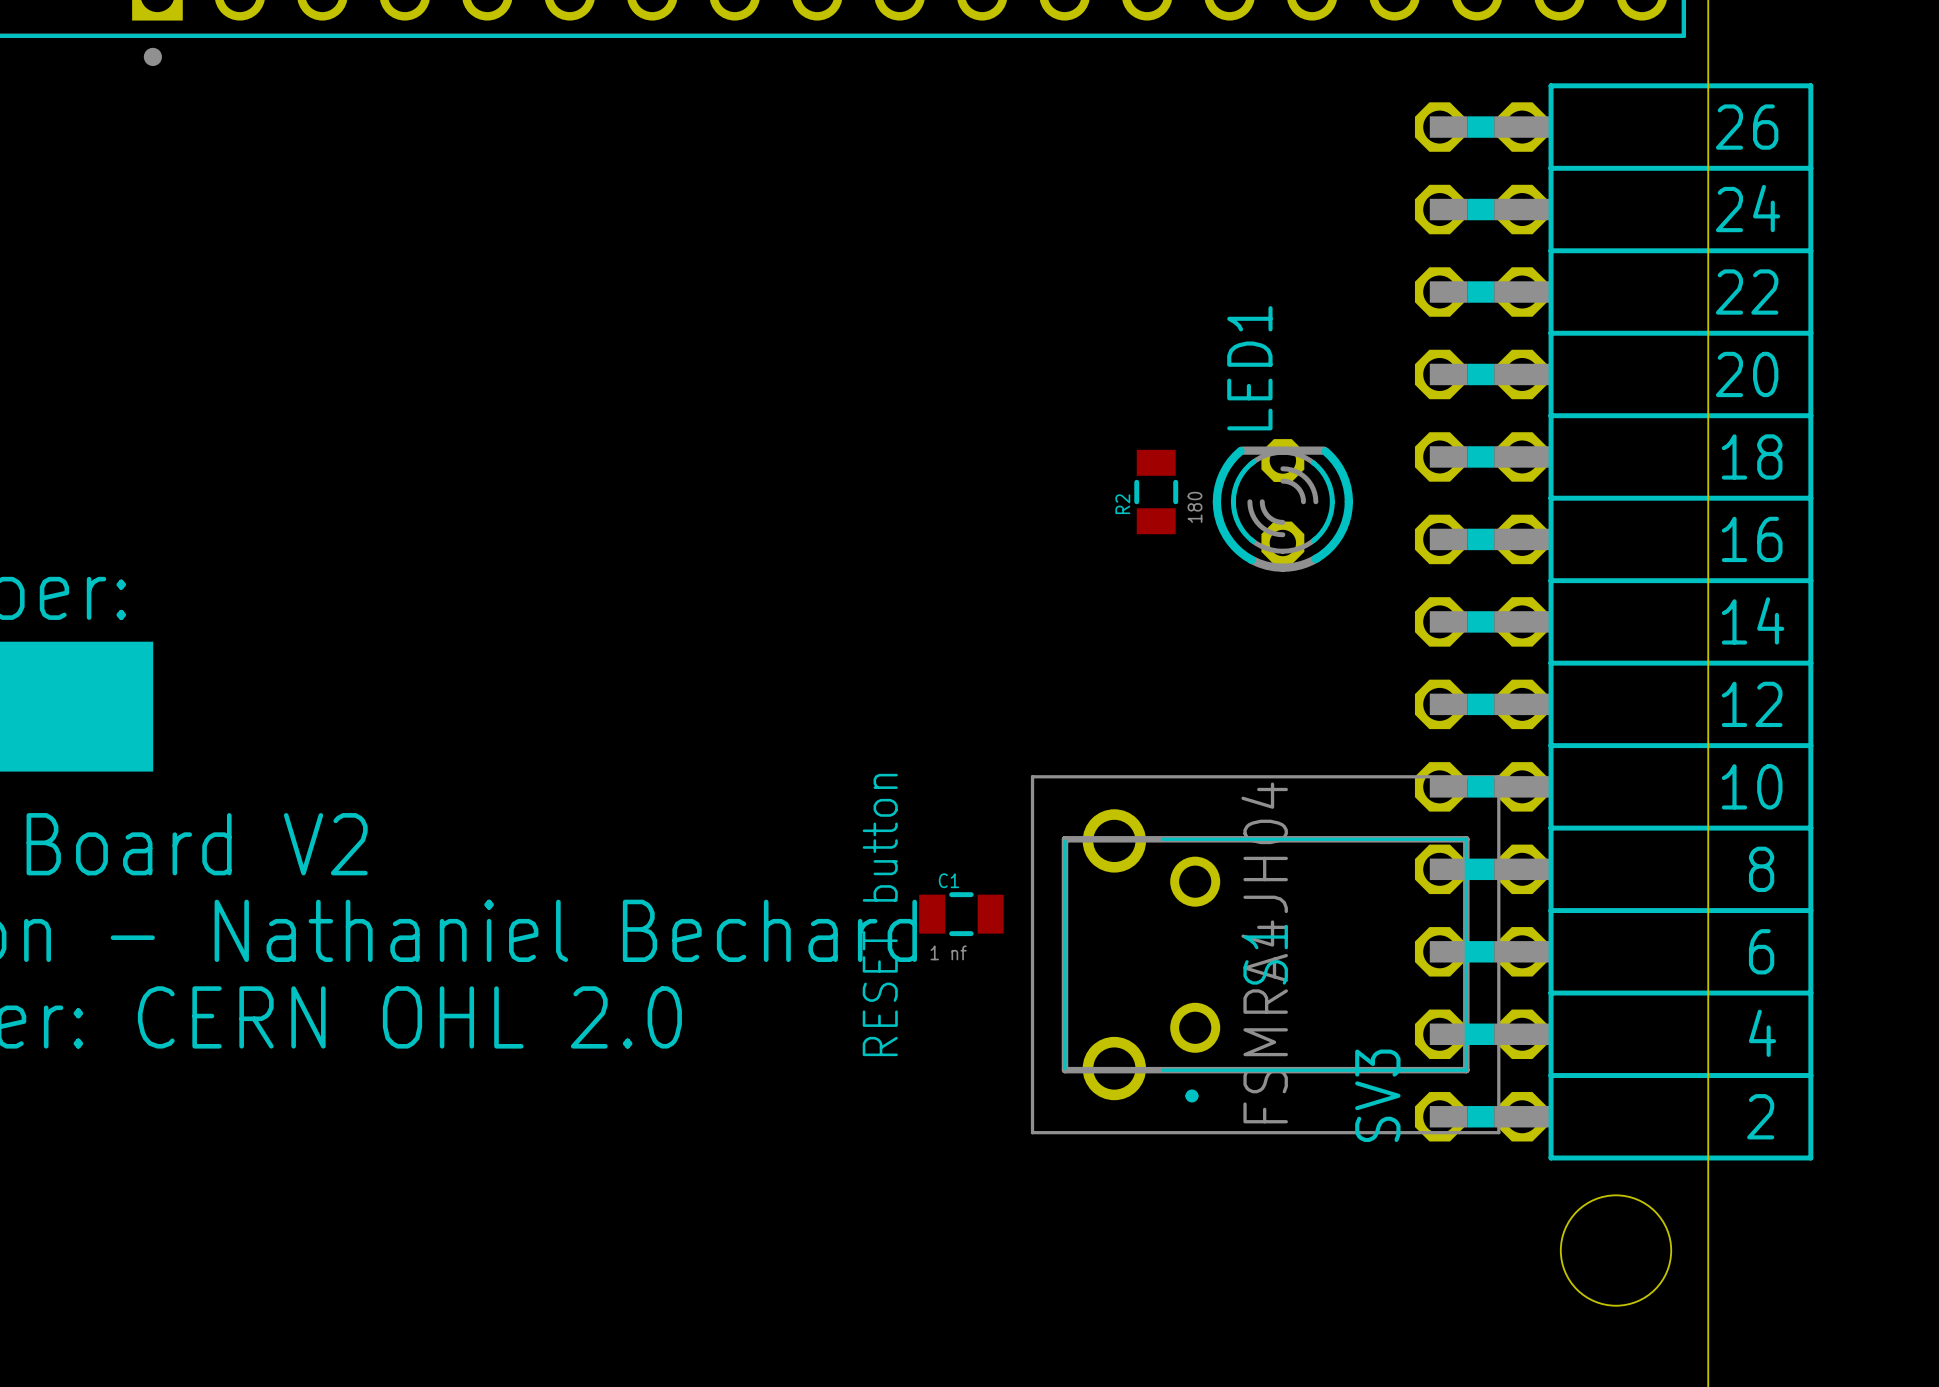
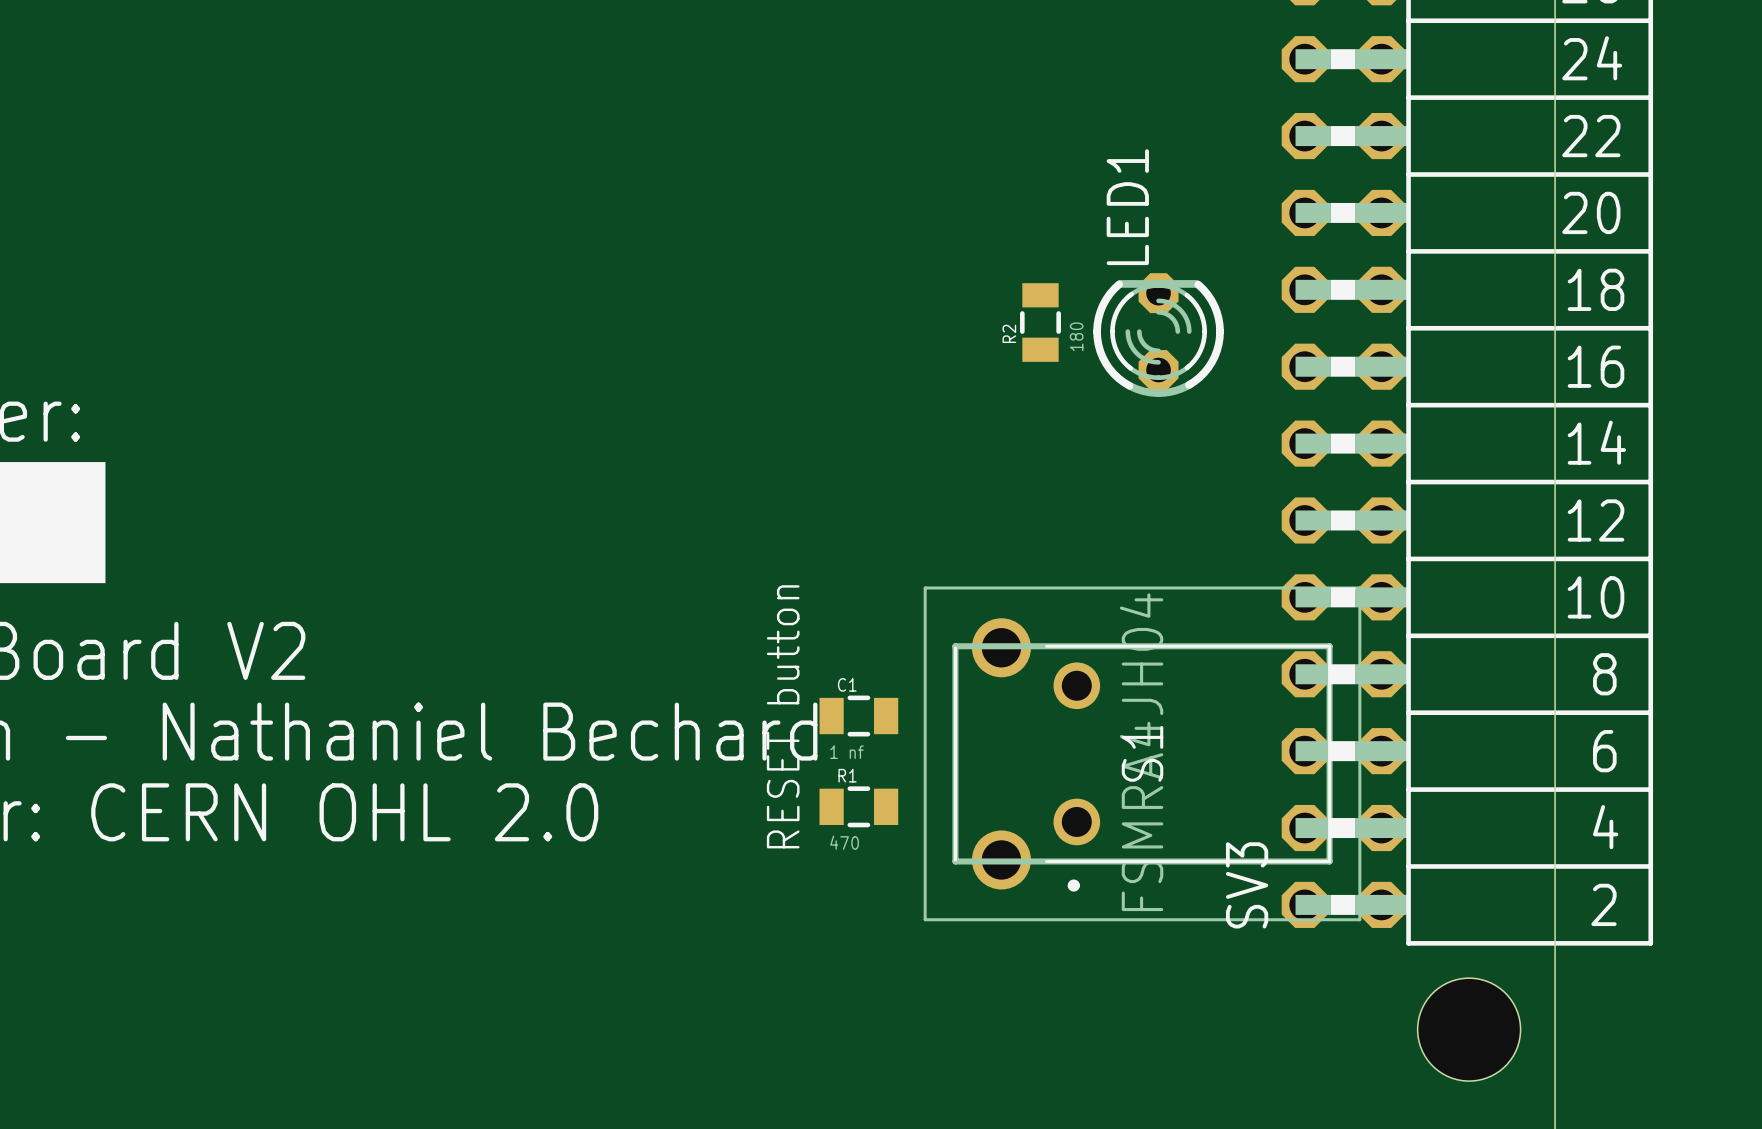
R1: none -> 470 (858, 806)

